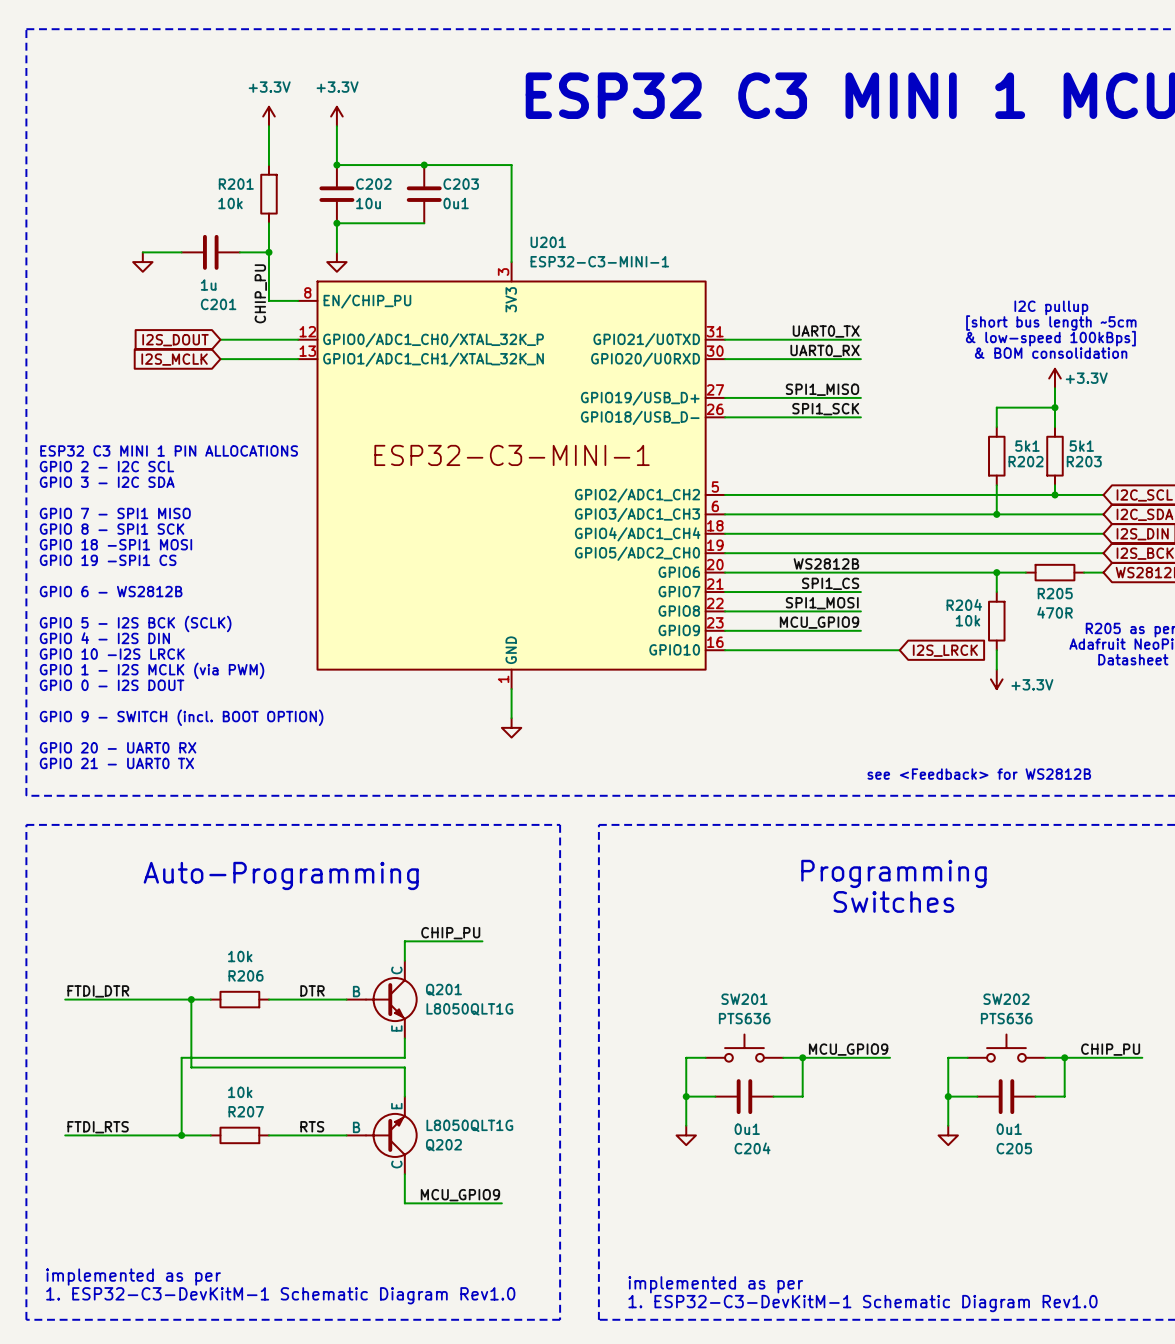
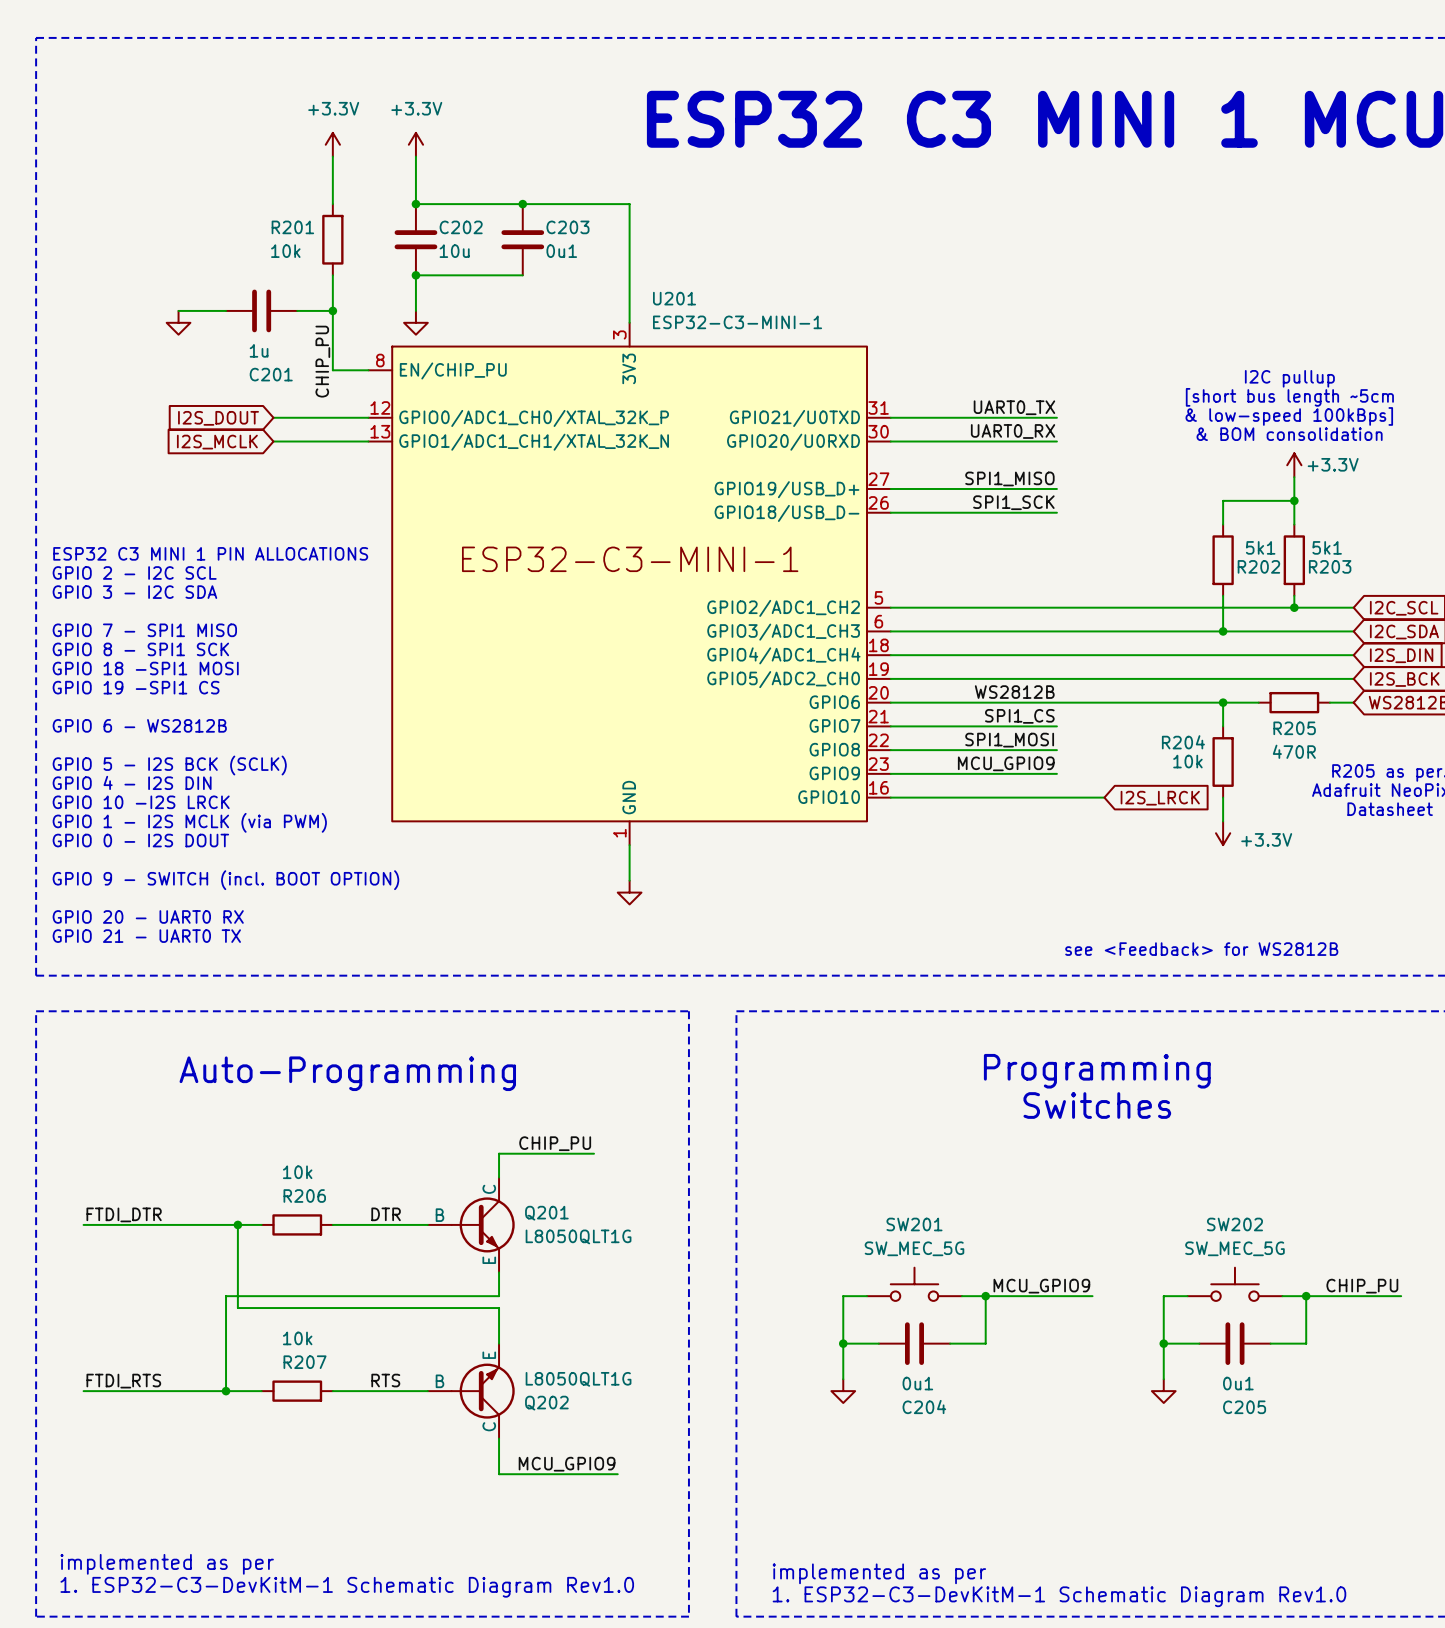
SW201 value: PTS636 (744, 1018) -> SW_MEC_5G (914, 1248)
SW202 value: PTS636 (1006, 1018) -> SW_MEC_5G (1234, 1248)

